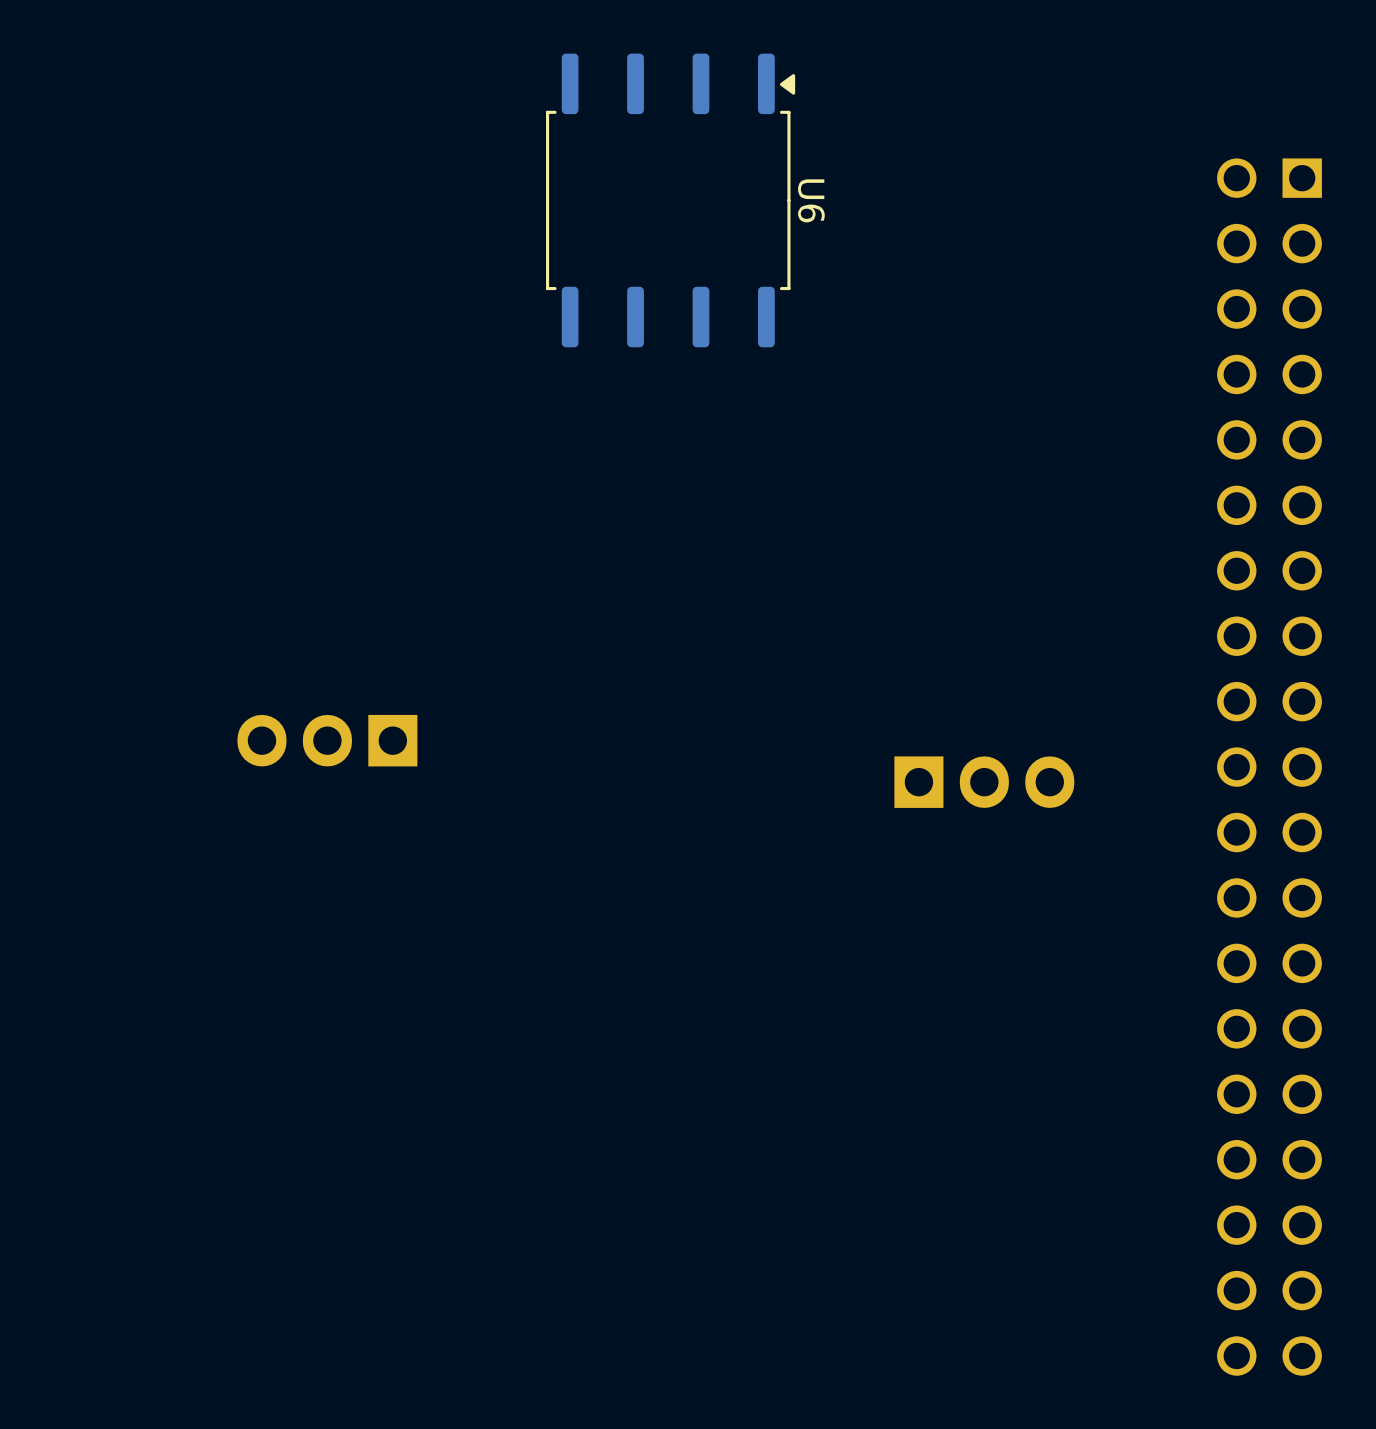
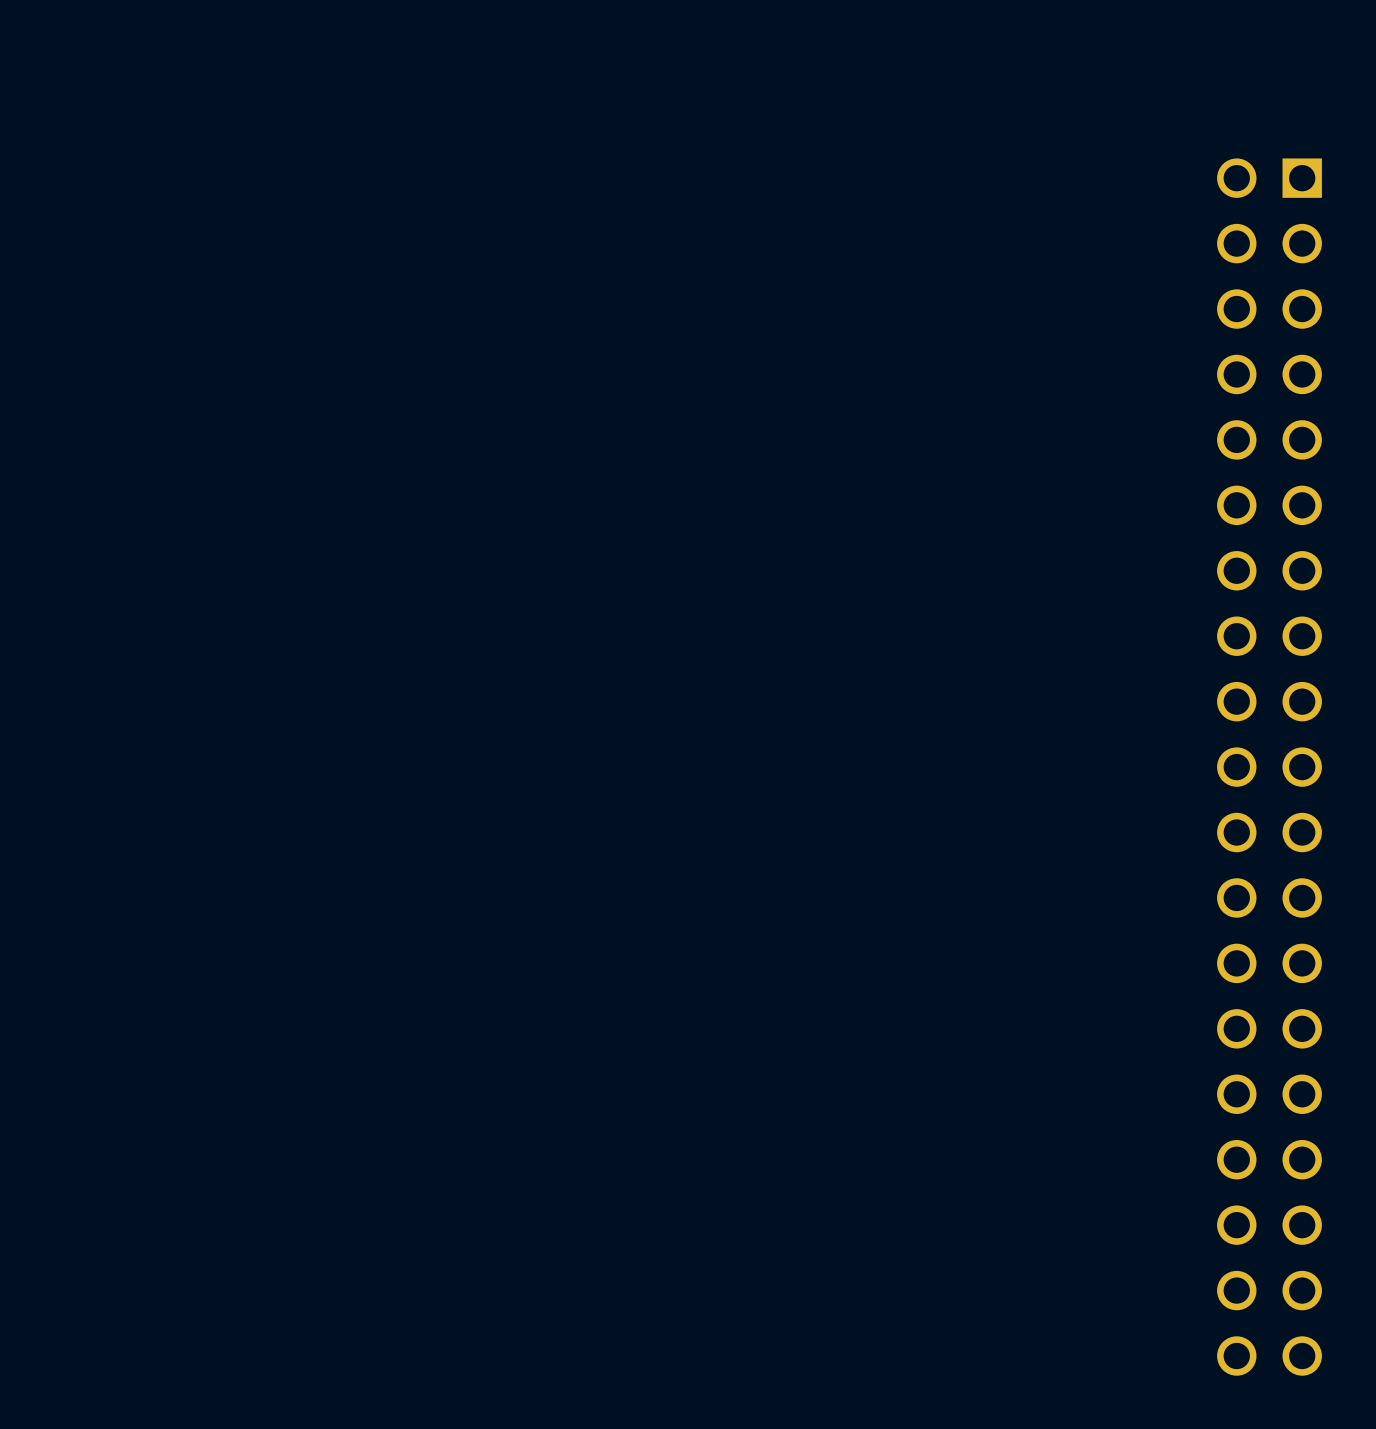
U6: (670, 200) -> none
part: (327, 740) -> none
part: (984, 782) -> none

